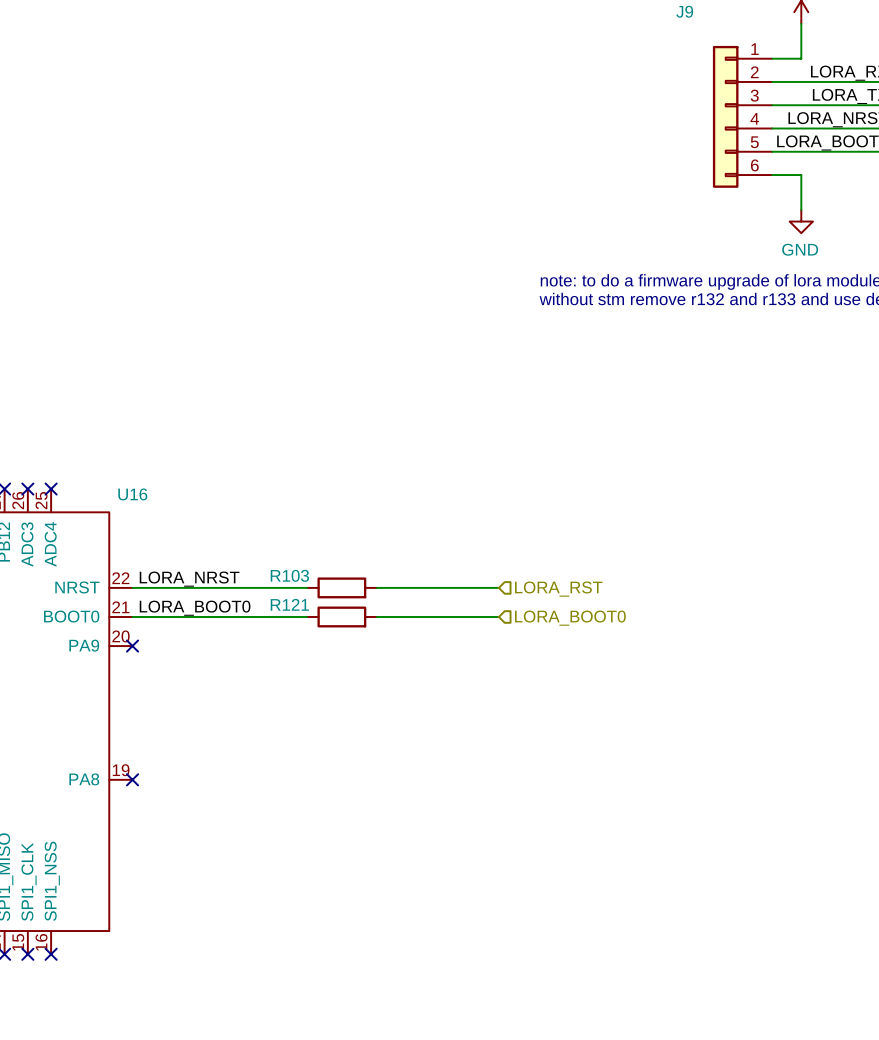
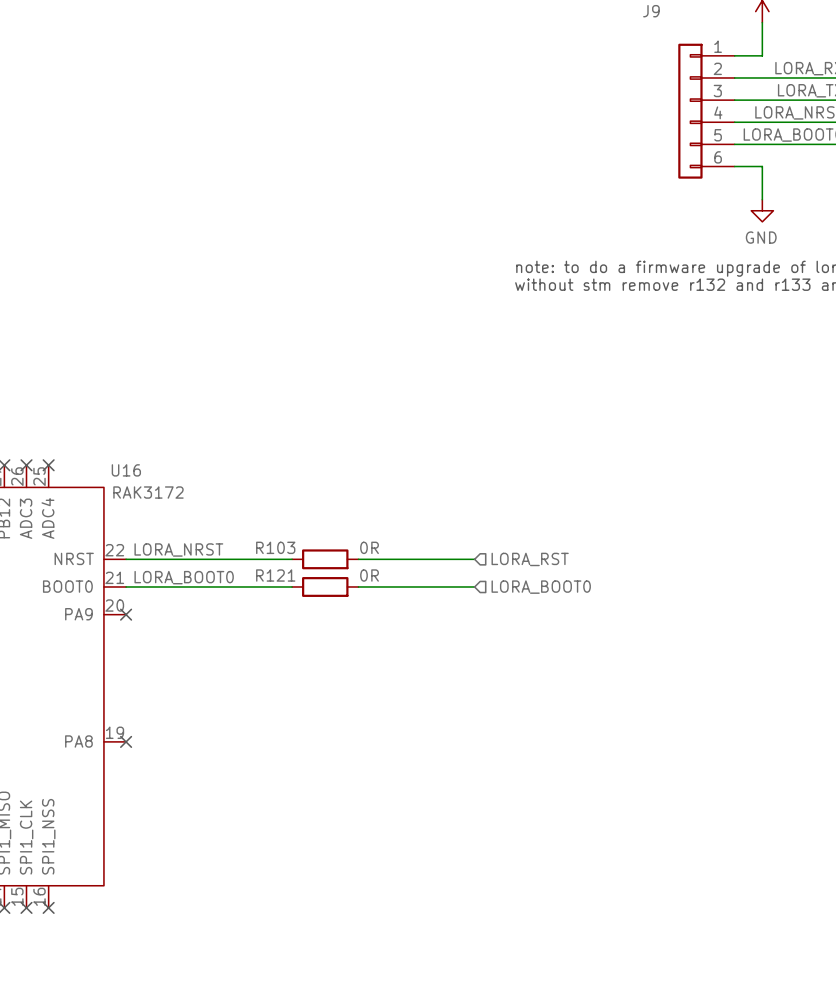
U16 value: none -> RAK3172 (148, 492)
R103 value: none -> 0R (369, 547)
R121 value: none -> 0R (369, 575)

